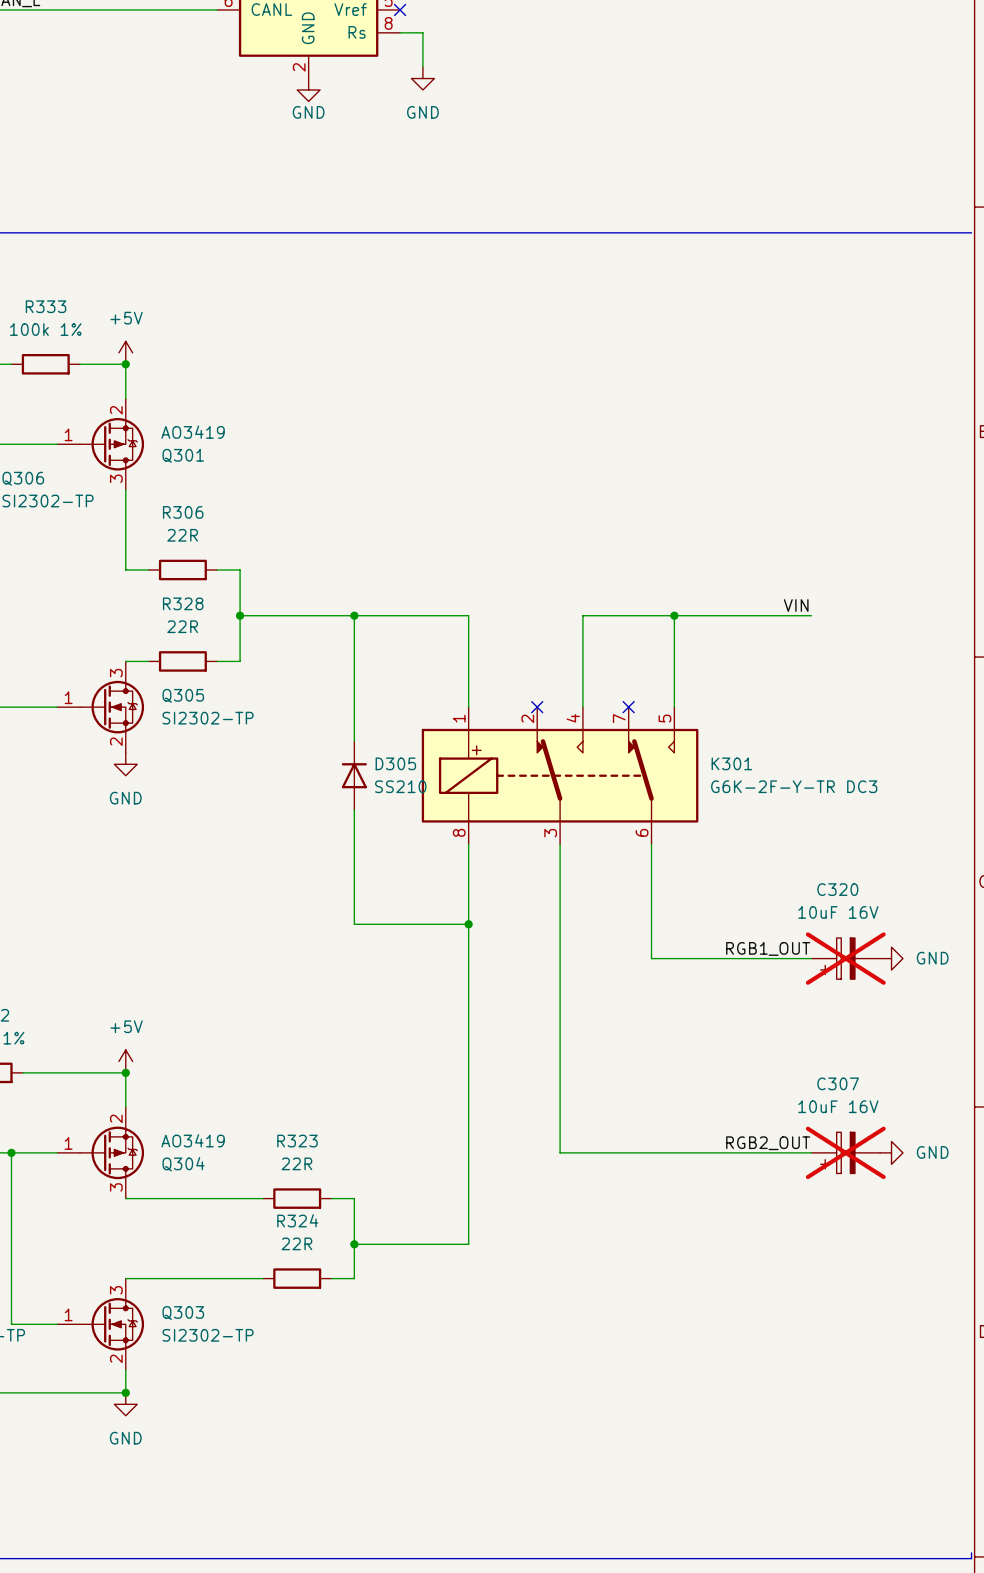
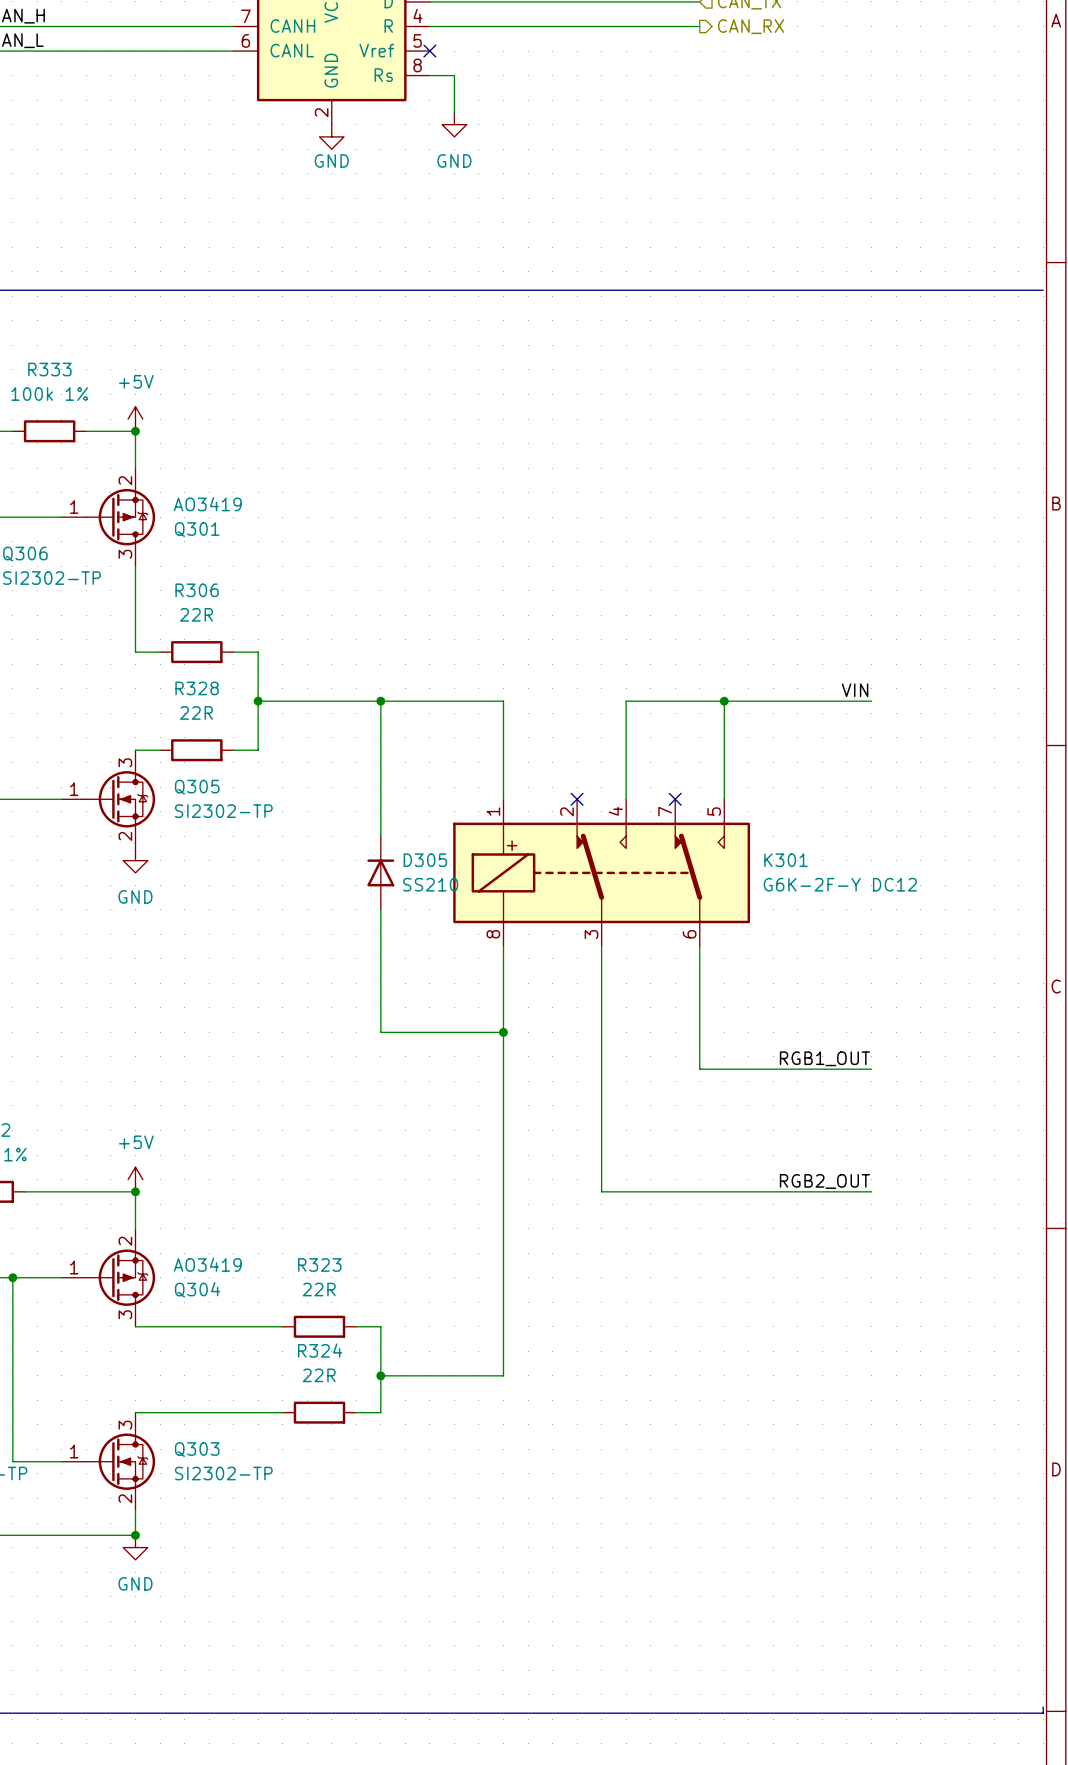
K301 value: G6K-2F-Y-TR DC3 (794, 786) -> G6K-2F-Y DC12 (840, 884)
C320: 10uF 16V (845, 958) -> none
power symbol: GND (891, 958) -> none
wire: (560, 1072) (560, 1152) (811, 1152) -> (601, 1191) (871, 1191)
label position: RGB2_OUT (768, 1143) -> RGB2_OUT (824, 1181)
C307: 10uF 16V (845, 1152) -> none
power symbol: GND (891, 1152) -> none

